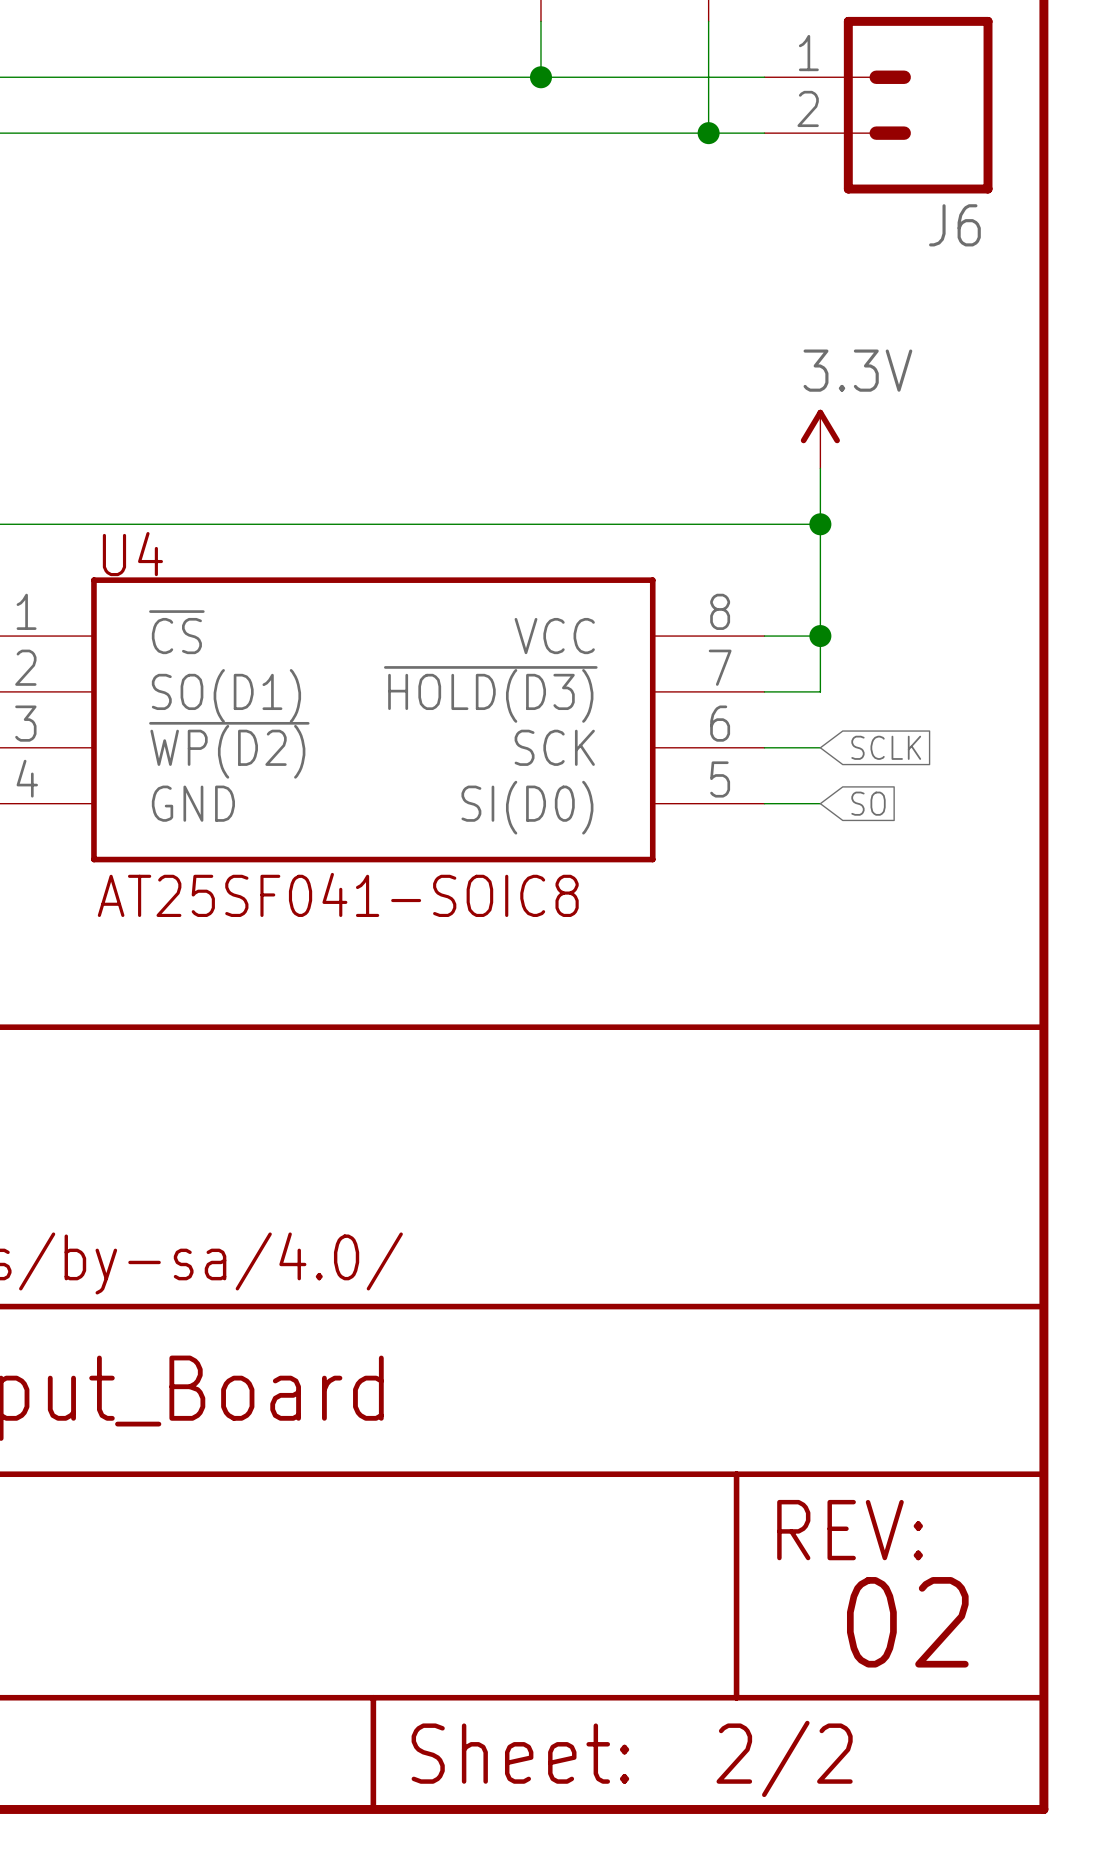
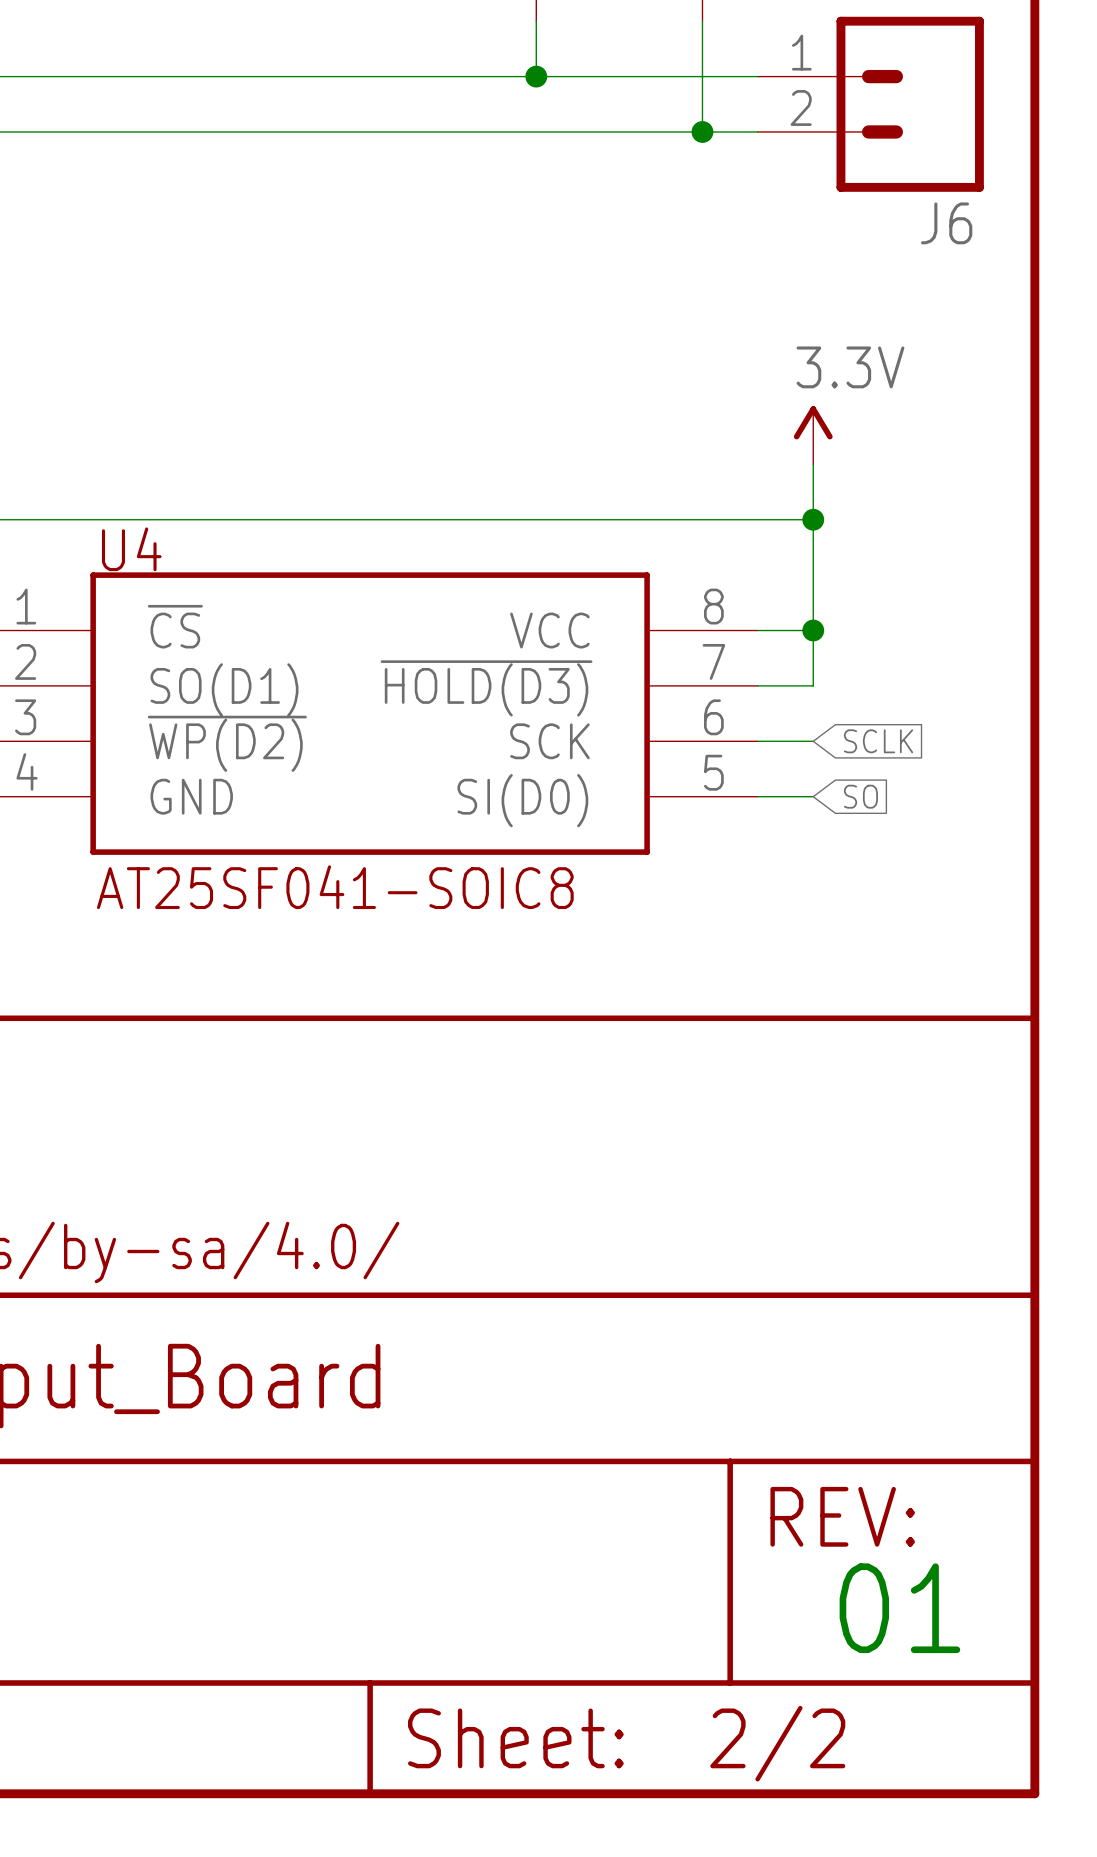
text: 02 (907, 1622) -> 01 (899, 1608)

